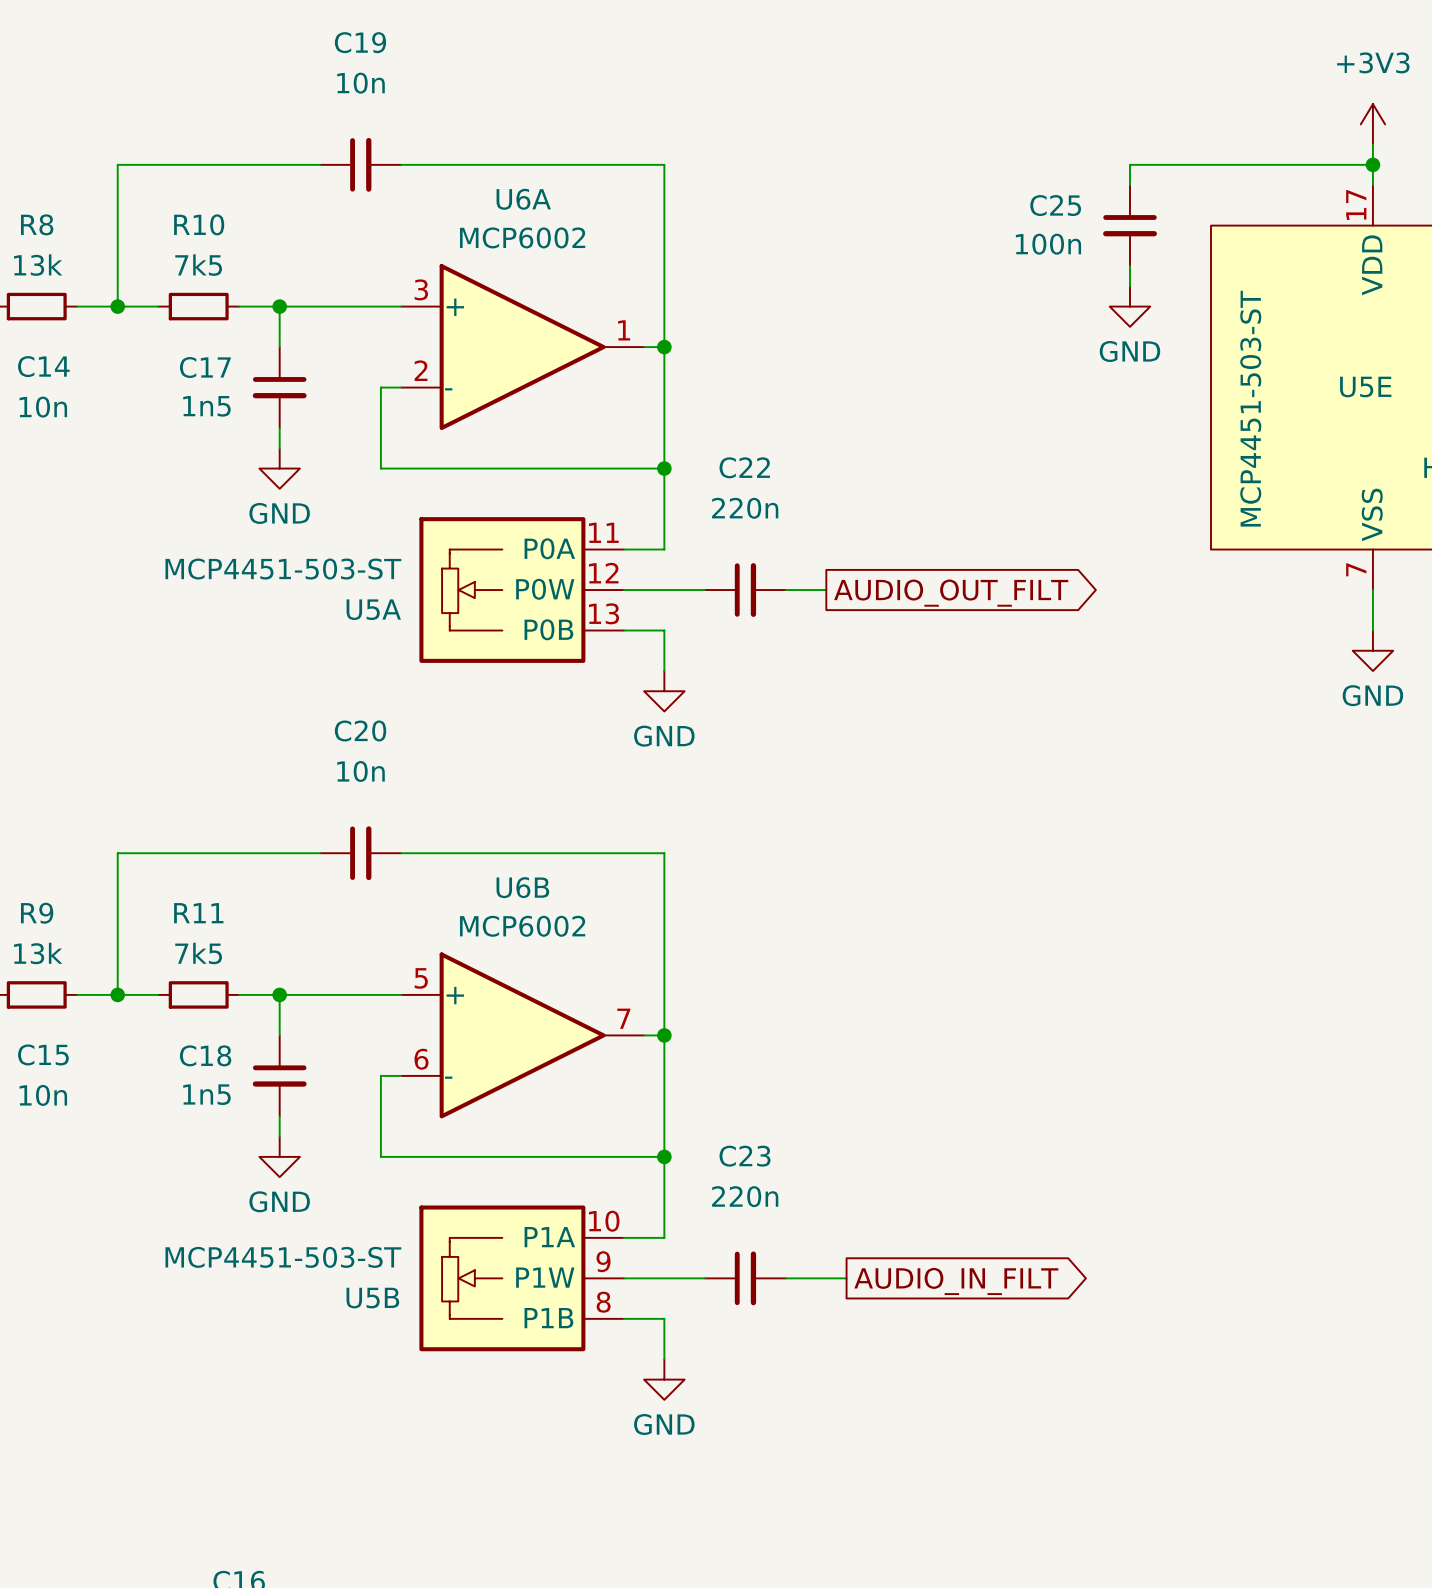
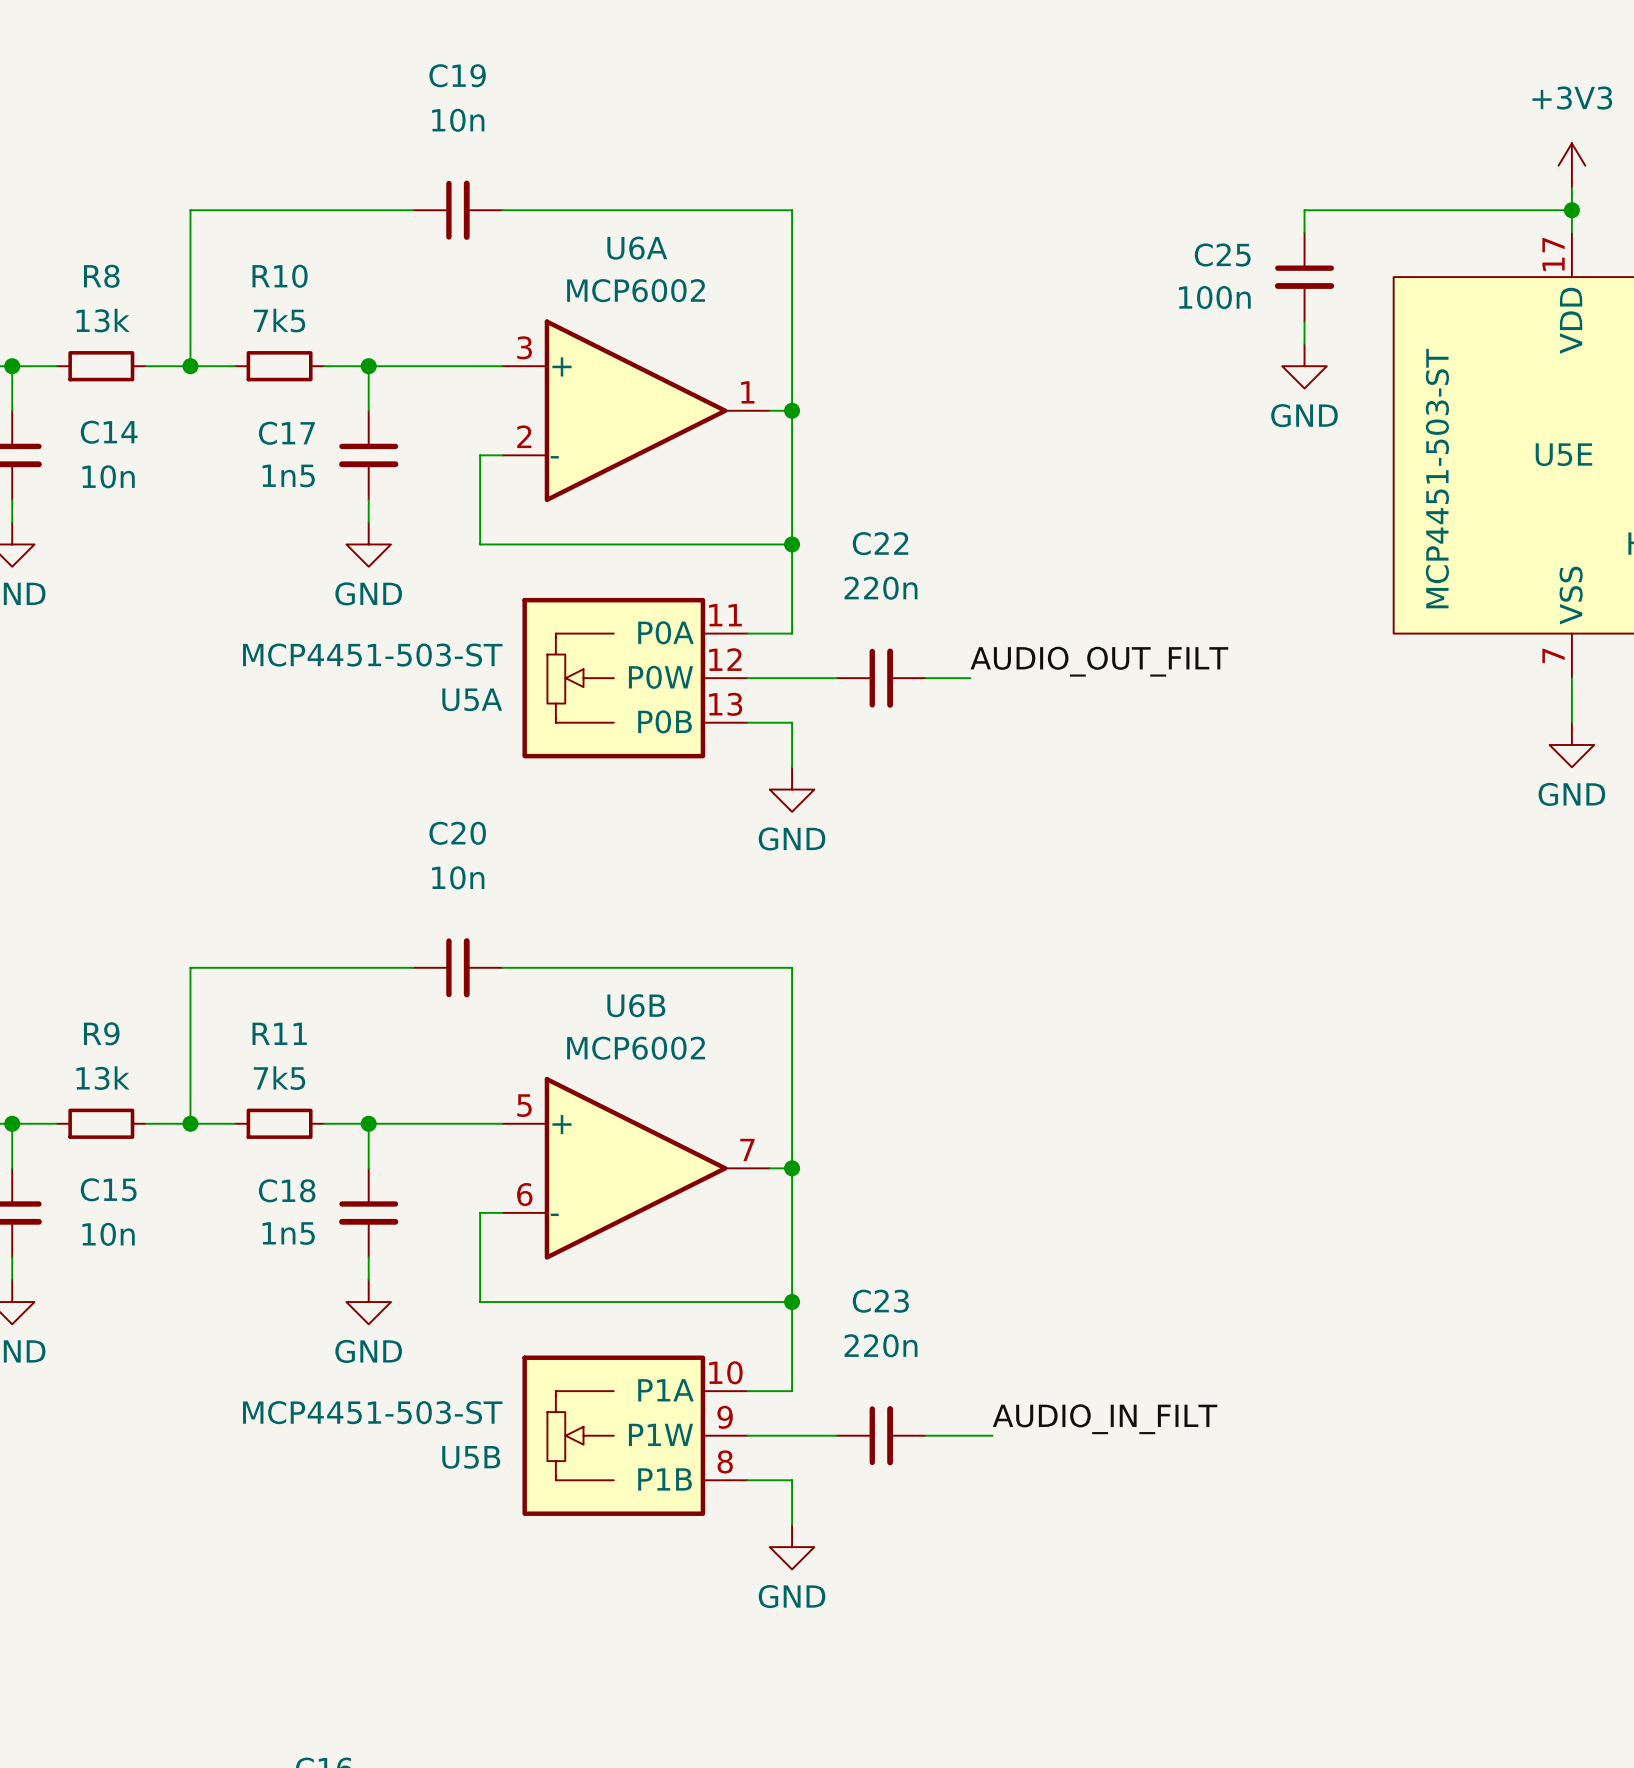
label: none -> AUDIO_OUT_FILT (1099, 661)
global label: AUDIO_OUT_FILT (951, 593) -> none
label: none -> AUDIO_IN_FILT (1105, 1419)
global label: AUDIO_IN_FILT (956, 1281) -> none

